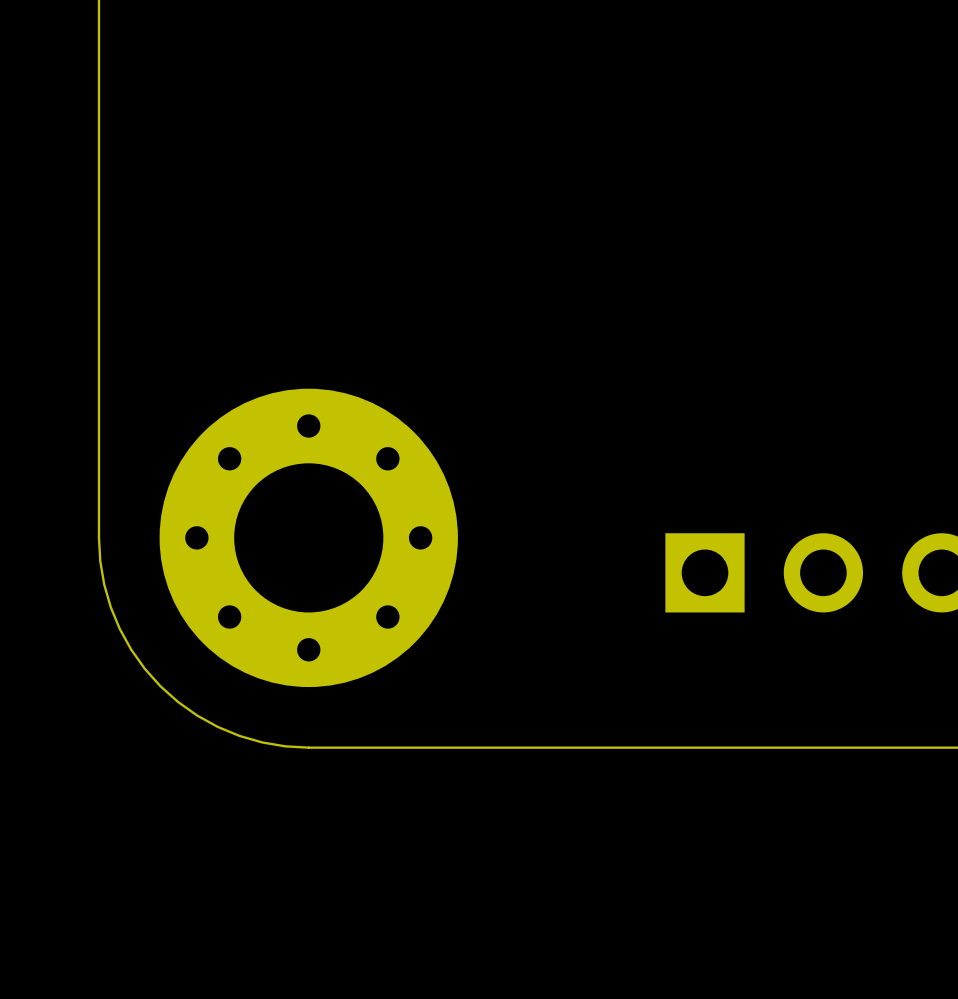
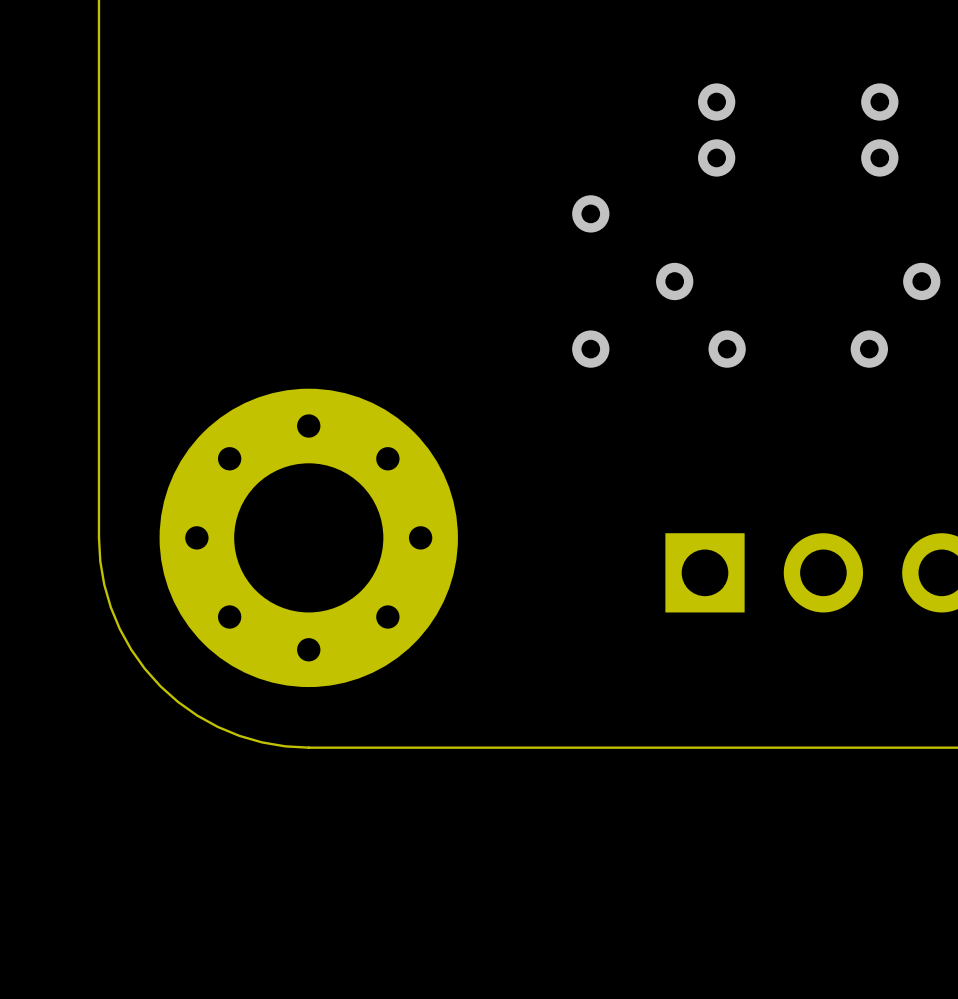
via: none -> (716, 102)
via: none -> (879, 102)
via: none -> (716, 157)
via: none -> (879, 157)
via: none -> (590, 213)
via: none -> (674, 281)
via: none -> (921, 281)
via: none -> (590, 349)
via: none -> (727, 349)
via: none -> (869, 349)

